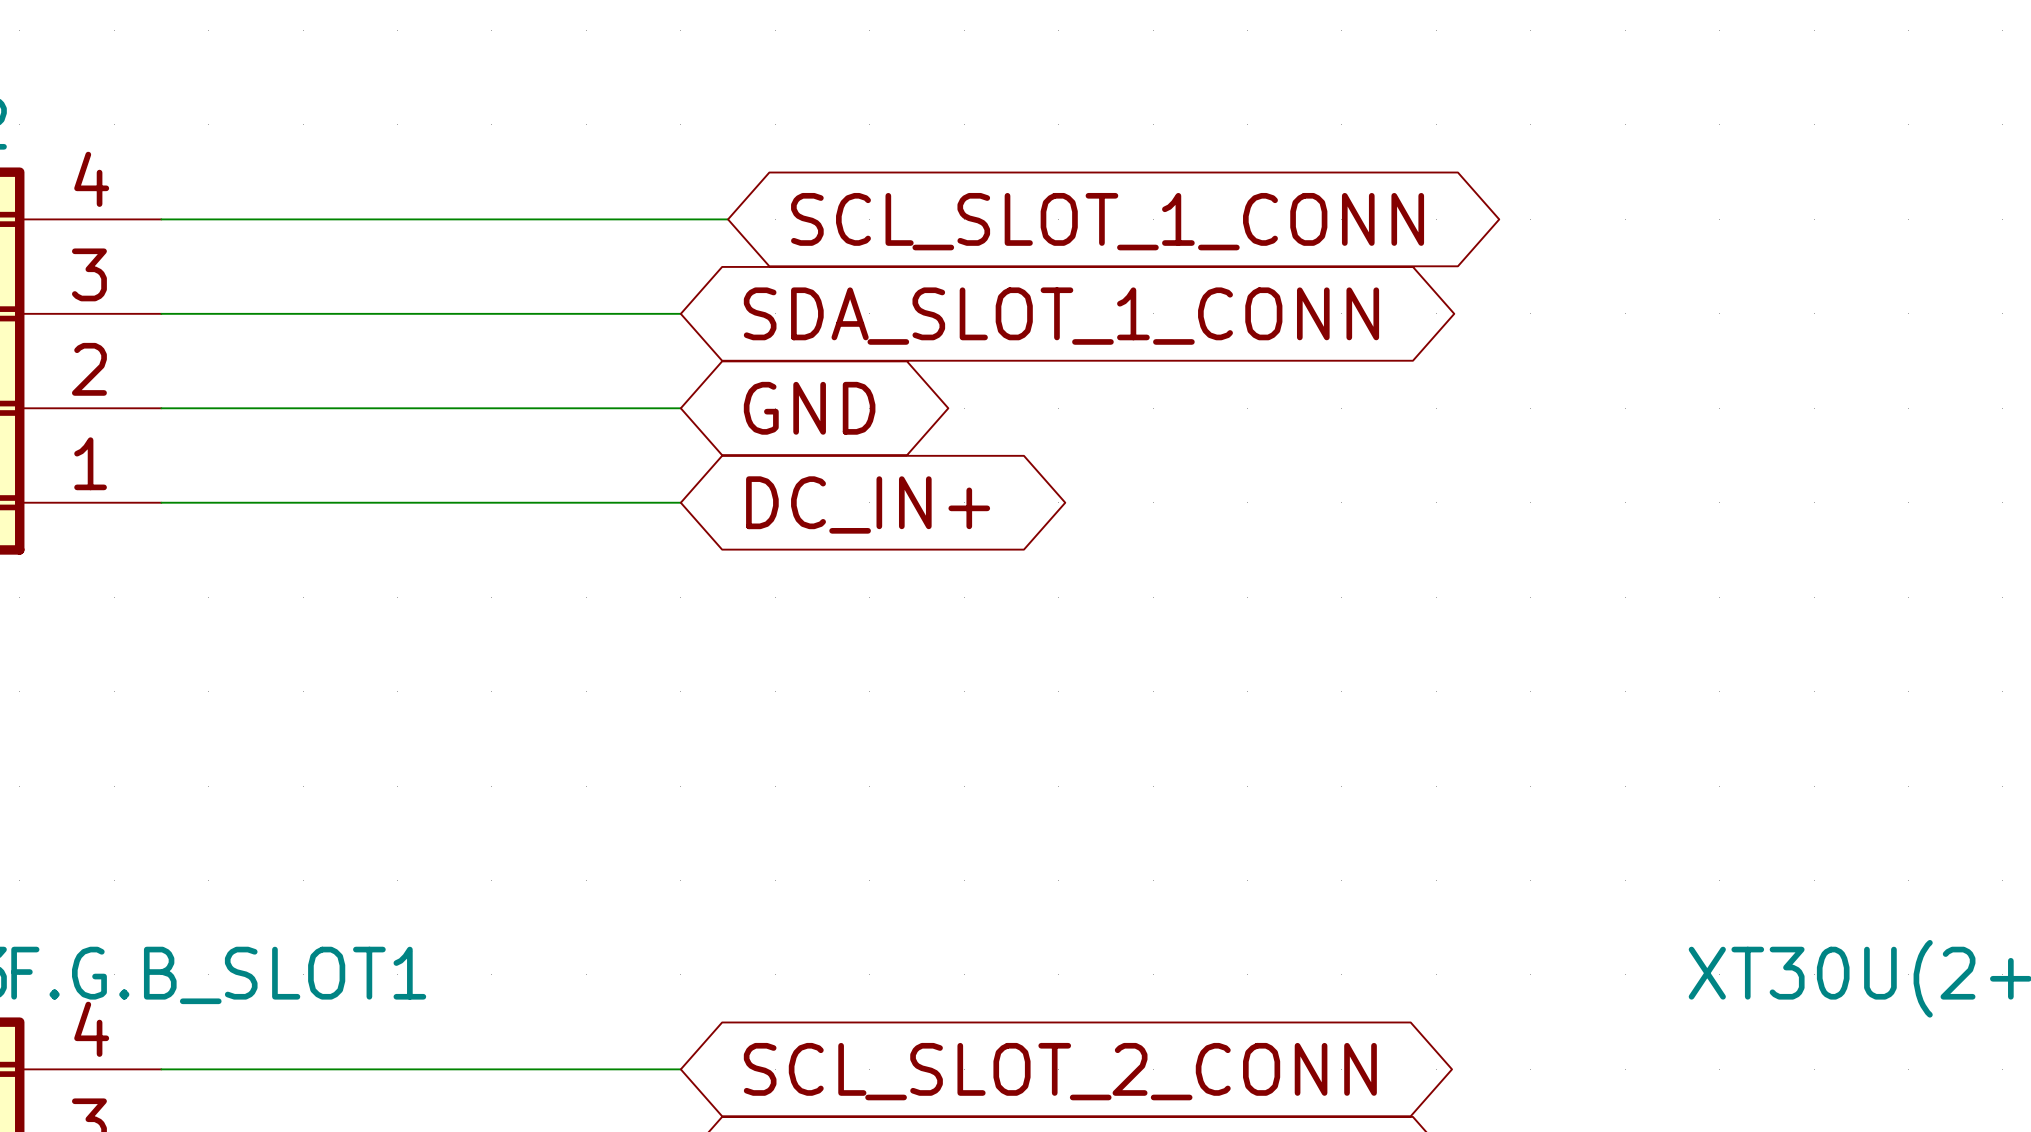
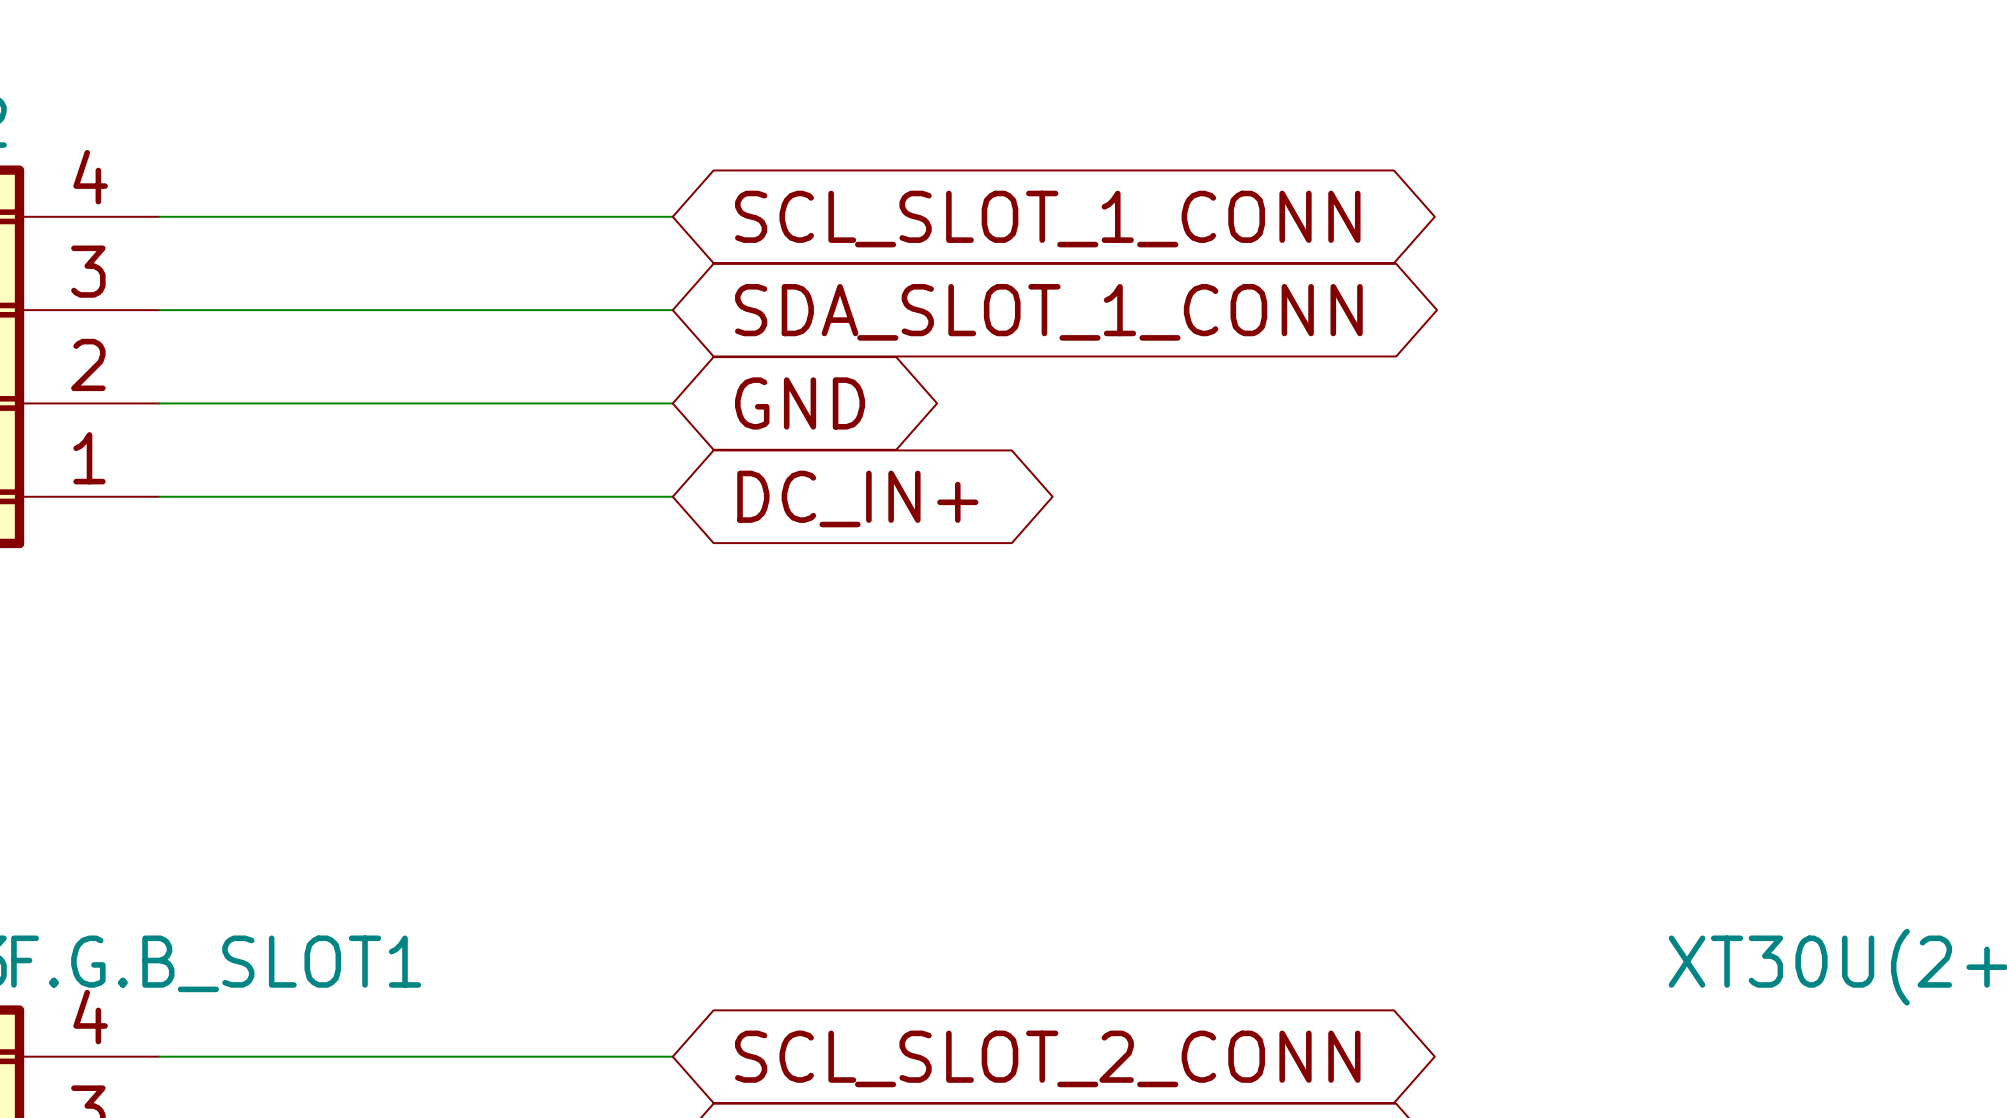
wire: (680, 219) (728, 219) -> none
global label position: SCL_SLOT_1_CONN (1107, 221) -> SCL_SLOT_1_CONN (1047, 219)

